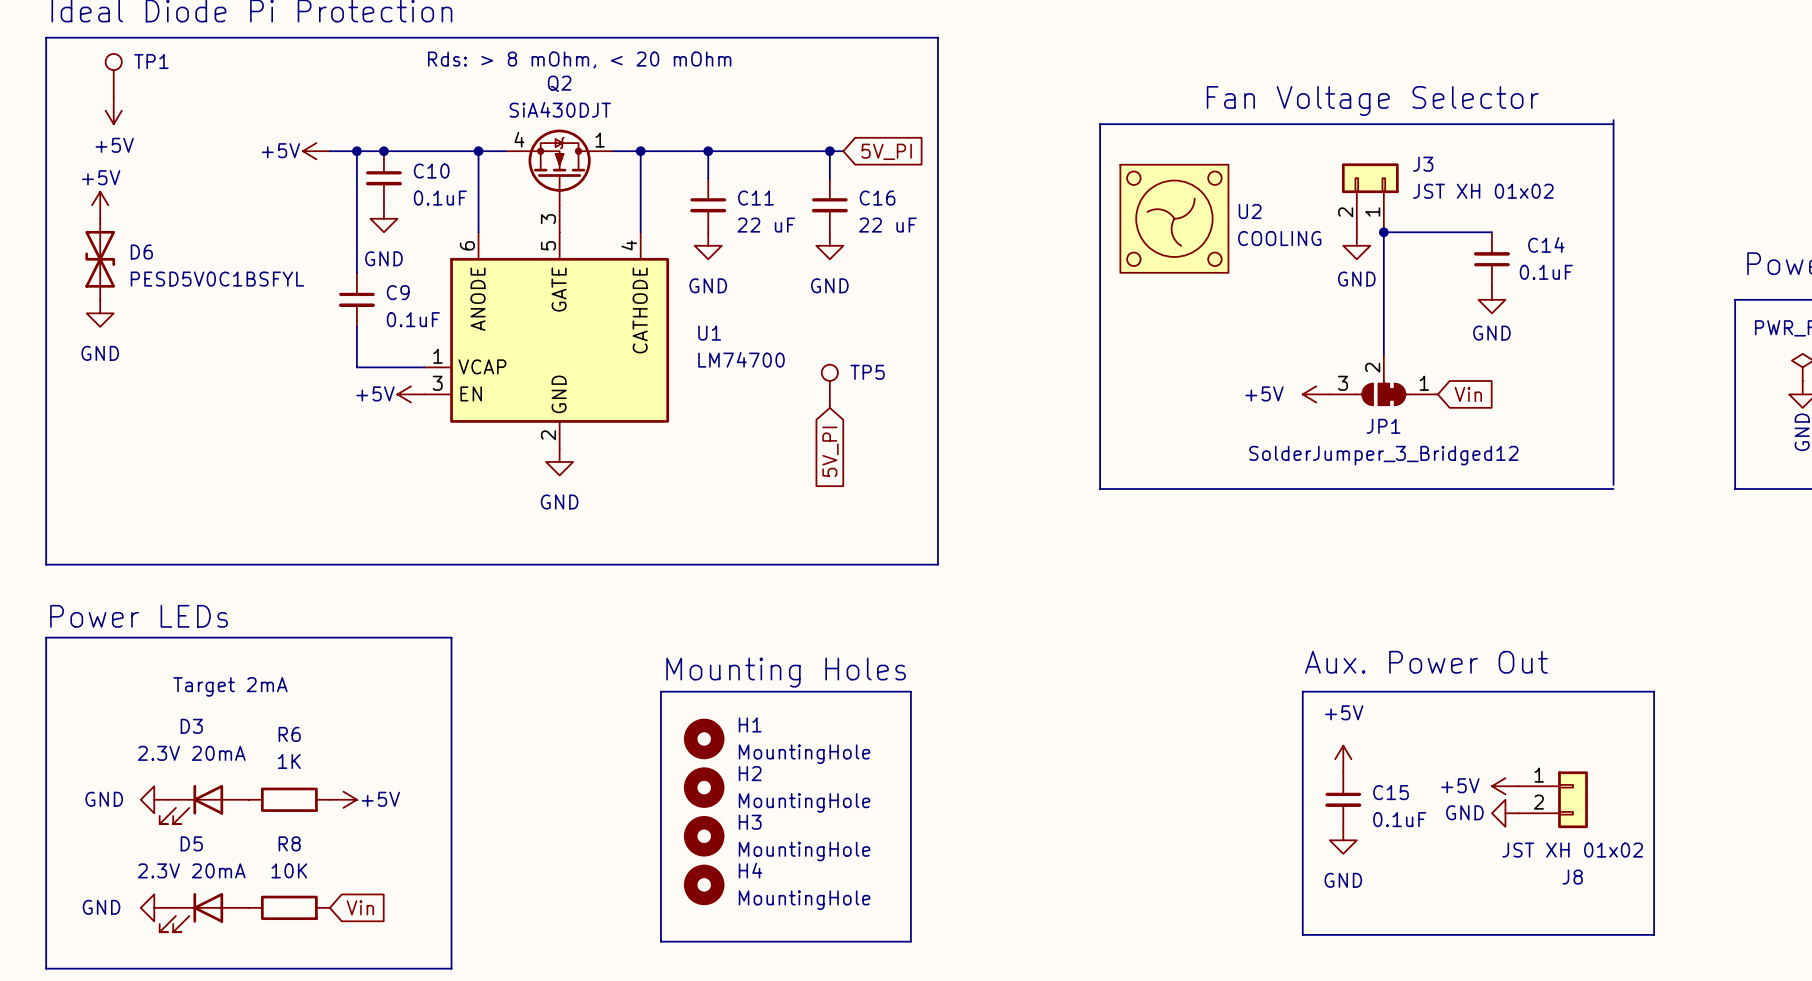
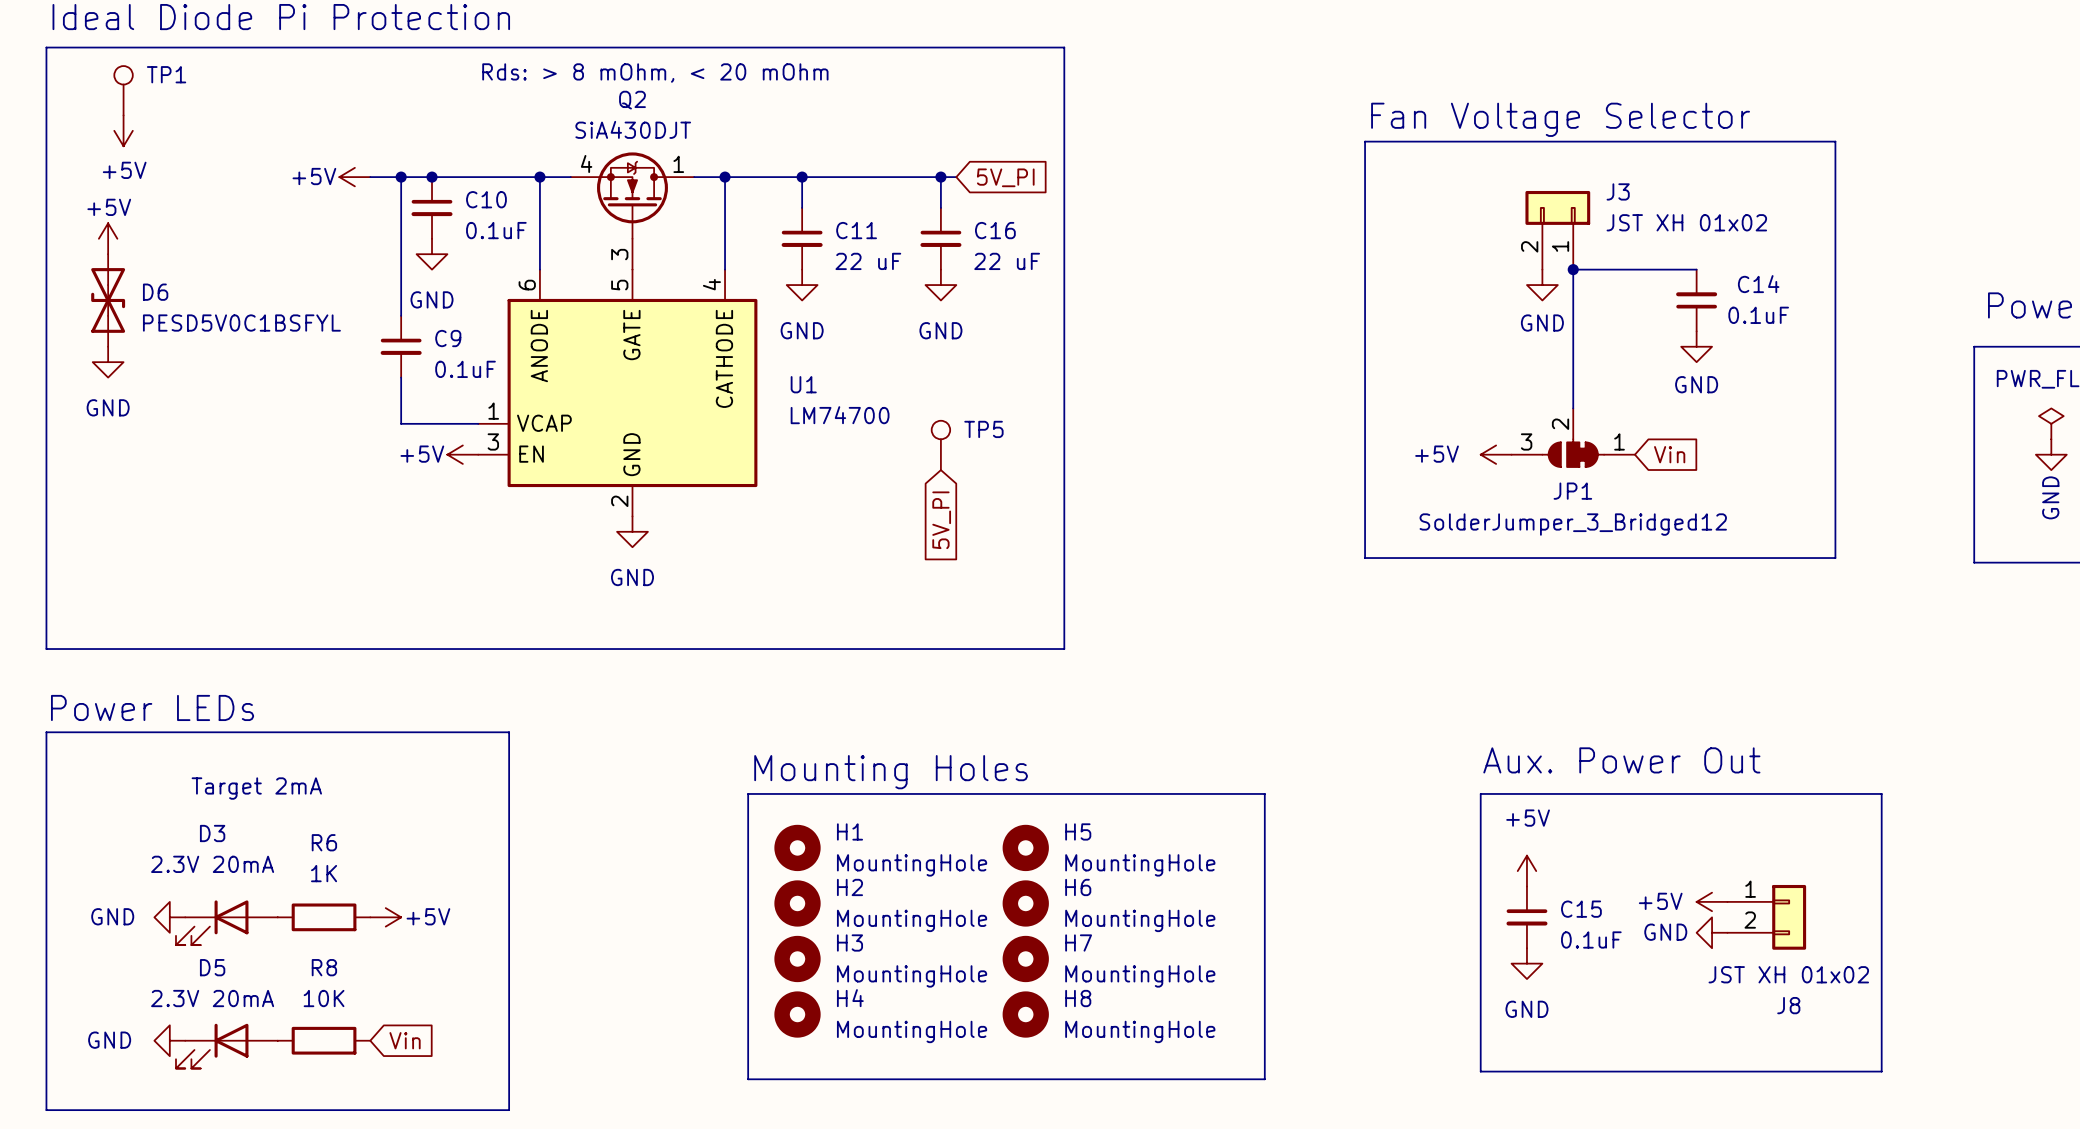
line: none -> (1835, 141) (1365, 141) (1365, 558) (1835, 558)
line: (1613, 124) (1100, 124) (1100, 489) (1613, 489) -> none
U2: COOLING (1174, 218) -> none
line: (910, 691) (910, 941) -> (1033, 793) (1264, 793) (1264, 1079) (1033, 1079)
H5: none -> MountingHole (1025, 847)
H6: none -> MountingHole (1025, 903)
H7: none -> MountingHole (1025, 958)
H8: none -> MountingHole (1025, 1014)

